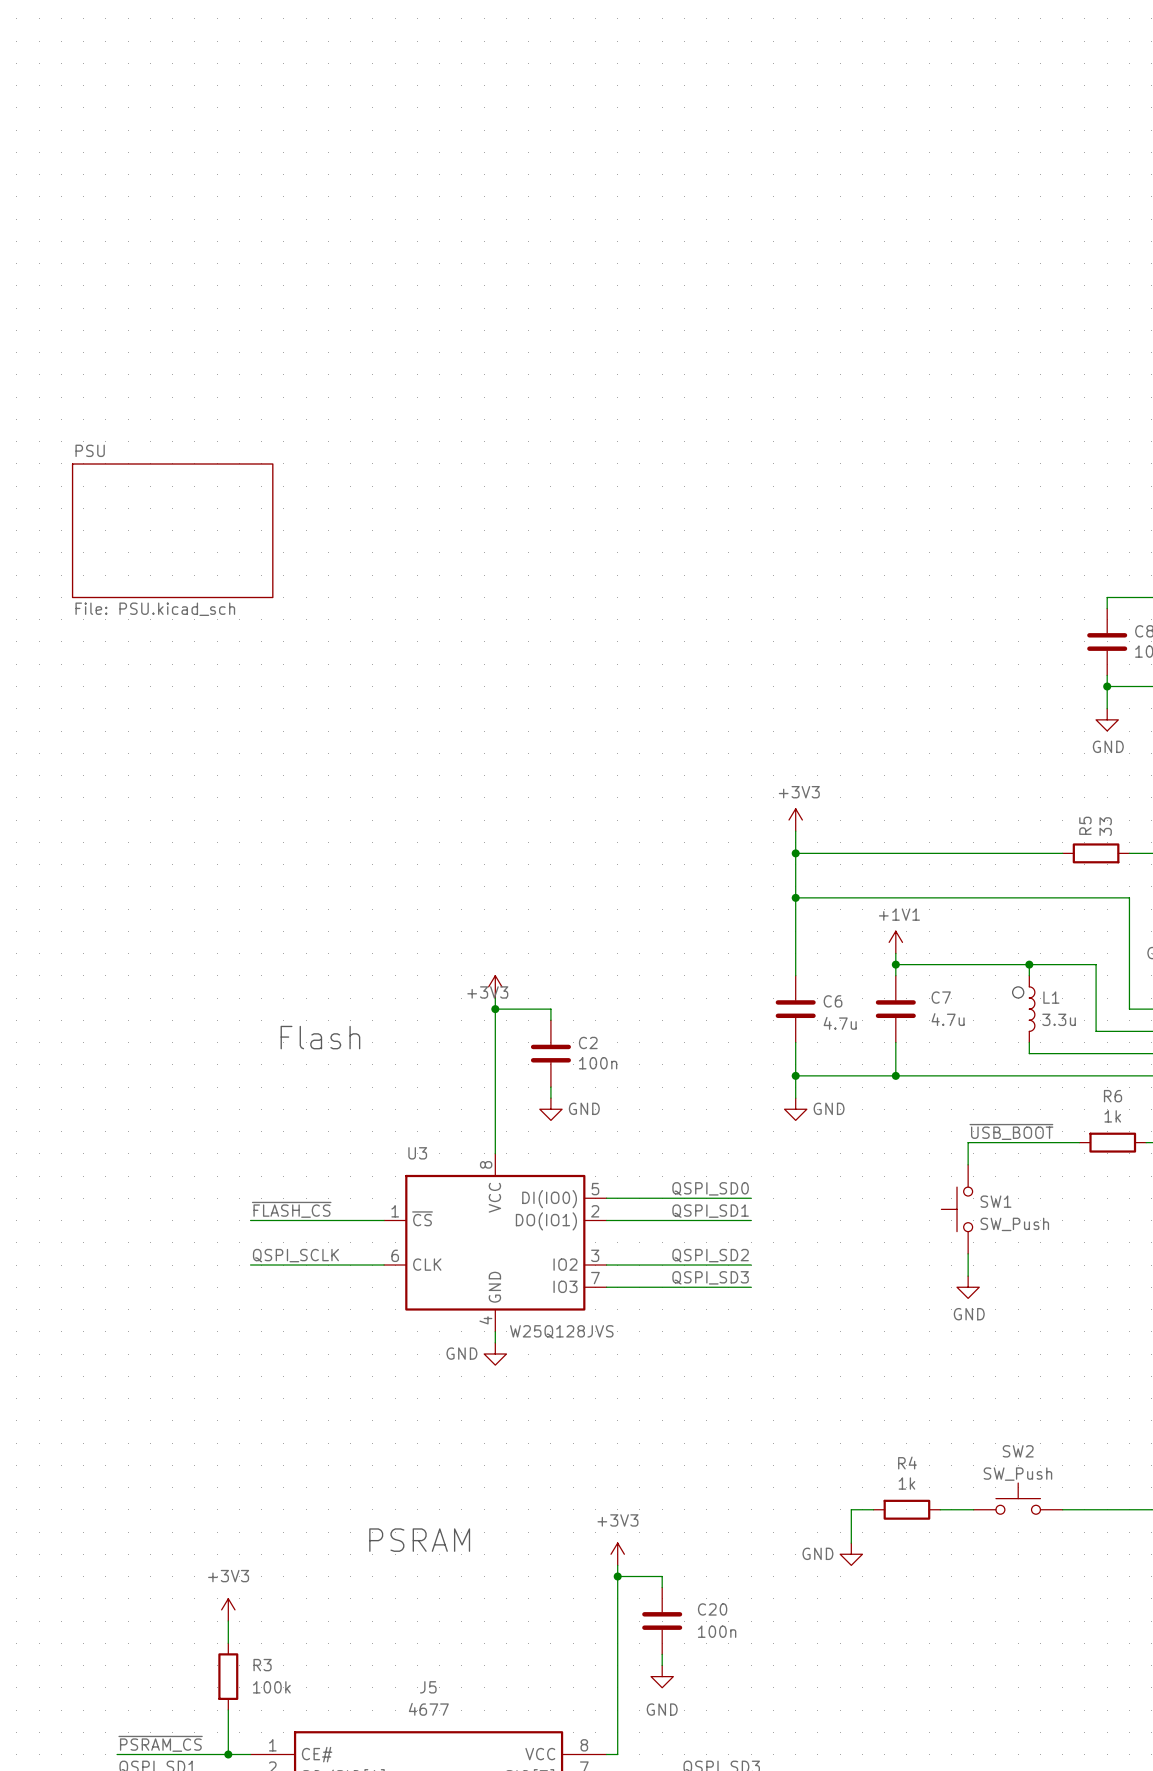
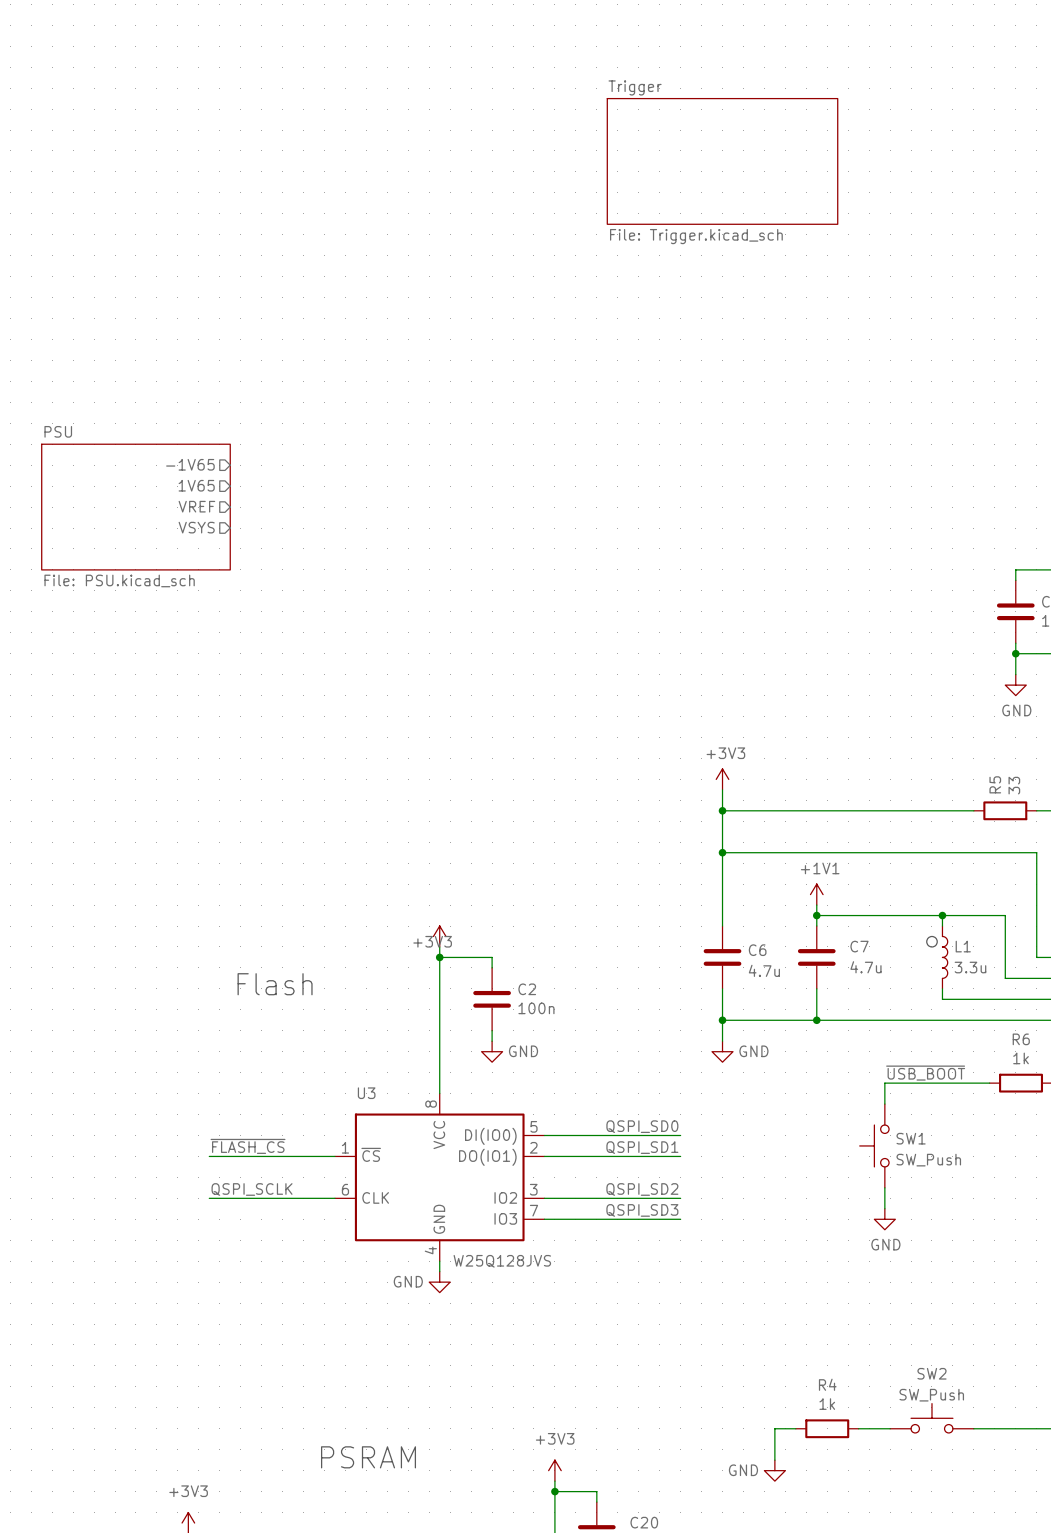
sheet Trigger: none -> File: Trigger.kicad_sch (722, 161)
sheet pin: none -> -1V65 (190, 464)
sheet pin: none -> 1V65 (196, 485)
sheet pin: none -> VREF (196, 506)
sheet pin: none -> VSYS (196, 527)

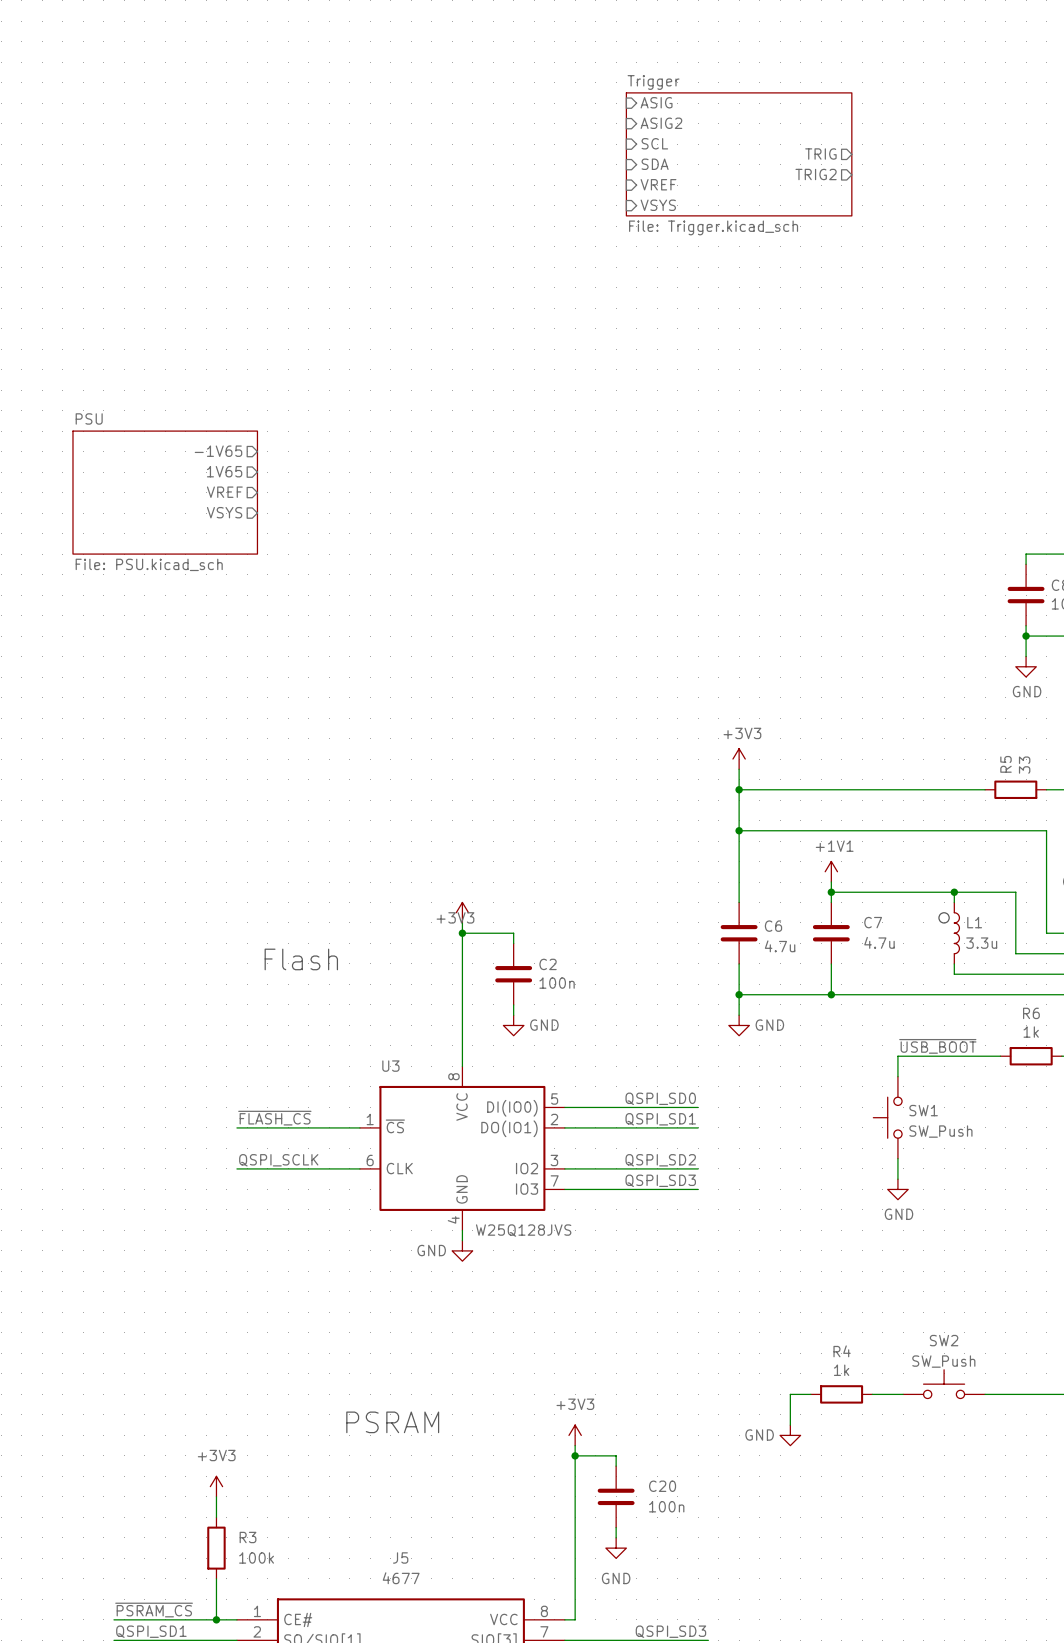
sheet pin: none -> ASIG (656, 102)
sheet pin: none -> ASIG2 (661, 123)
sheet pin: none -> SCL (654, 143)
sheet pin: none -> TRIG (820, 154)
sheet pin: none -> SDA (655, 164)
sheet pin: none -> TRIG2 (816, 174)
sheet pin: none -> VREF (658, 184)
sheet pin: none -> VSYS (658, 205)

